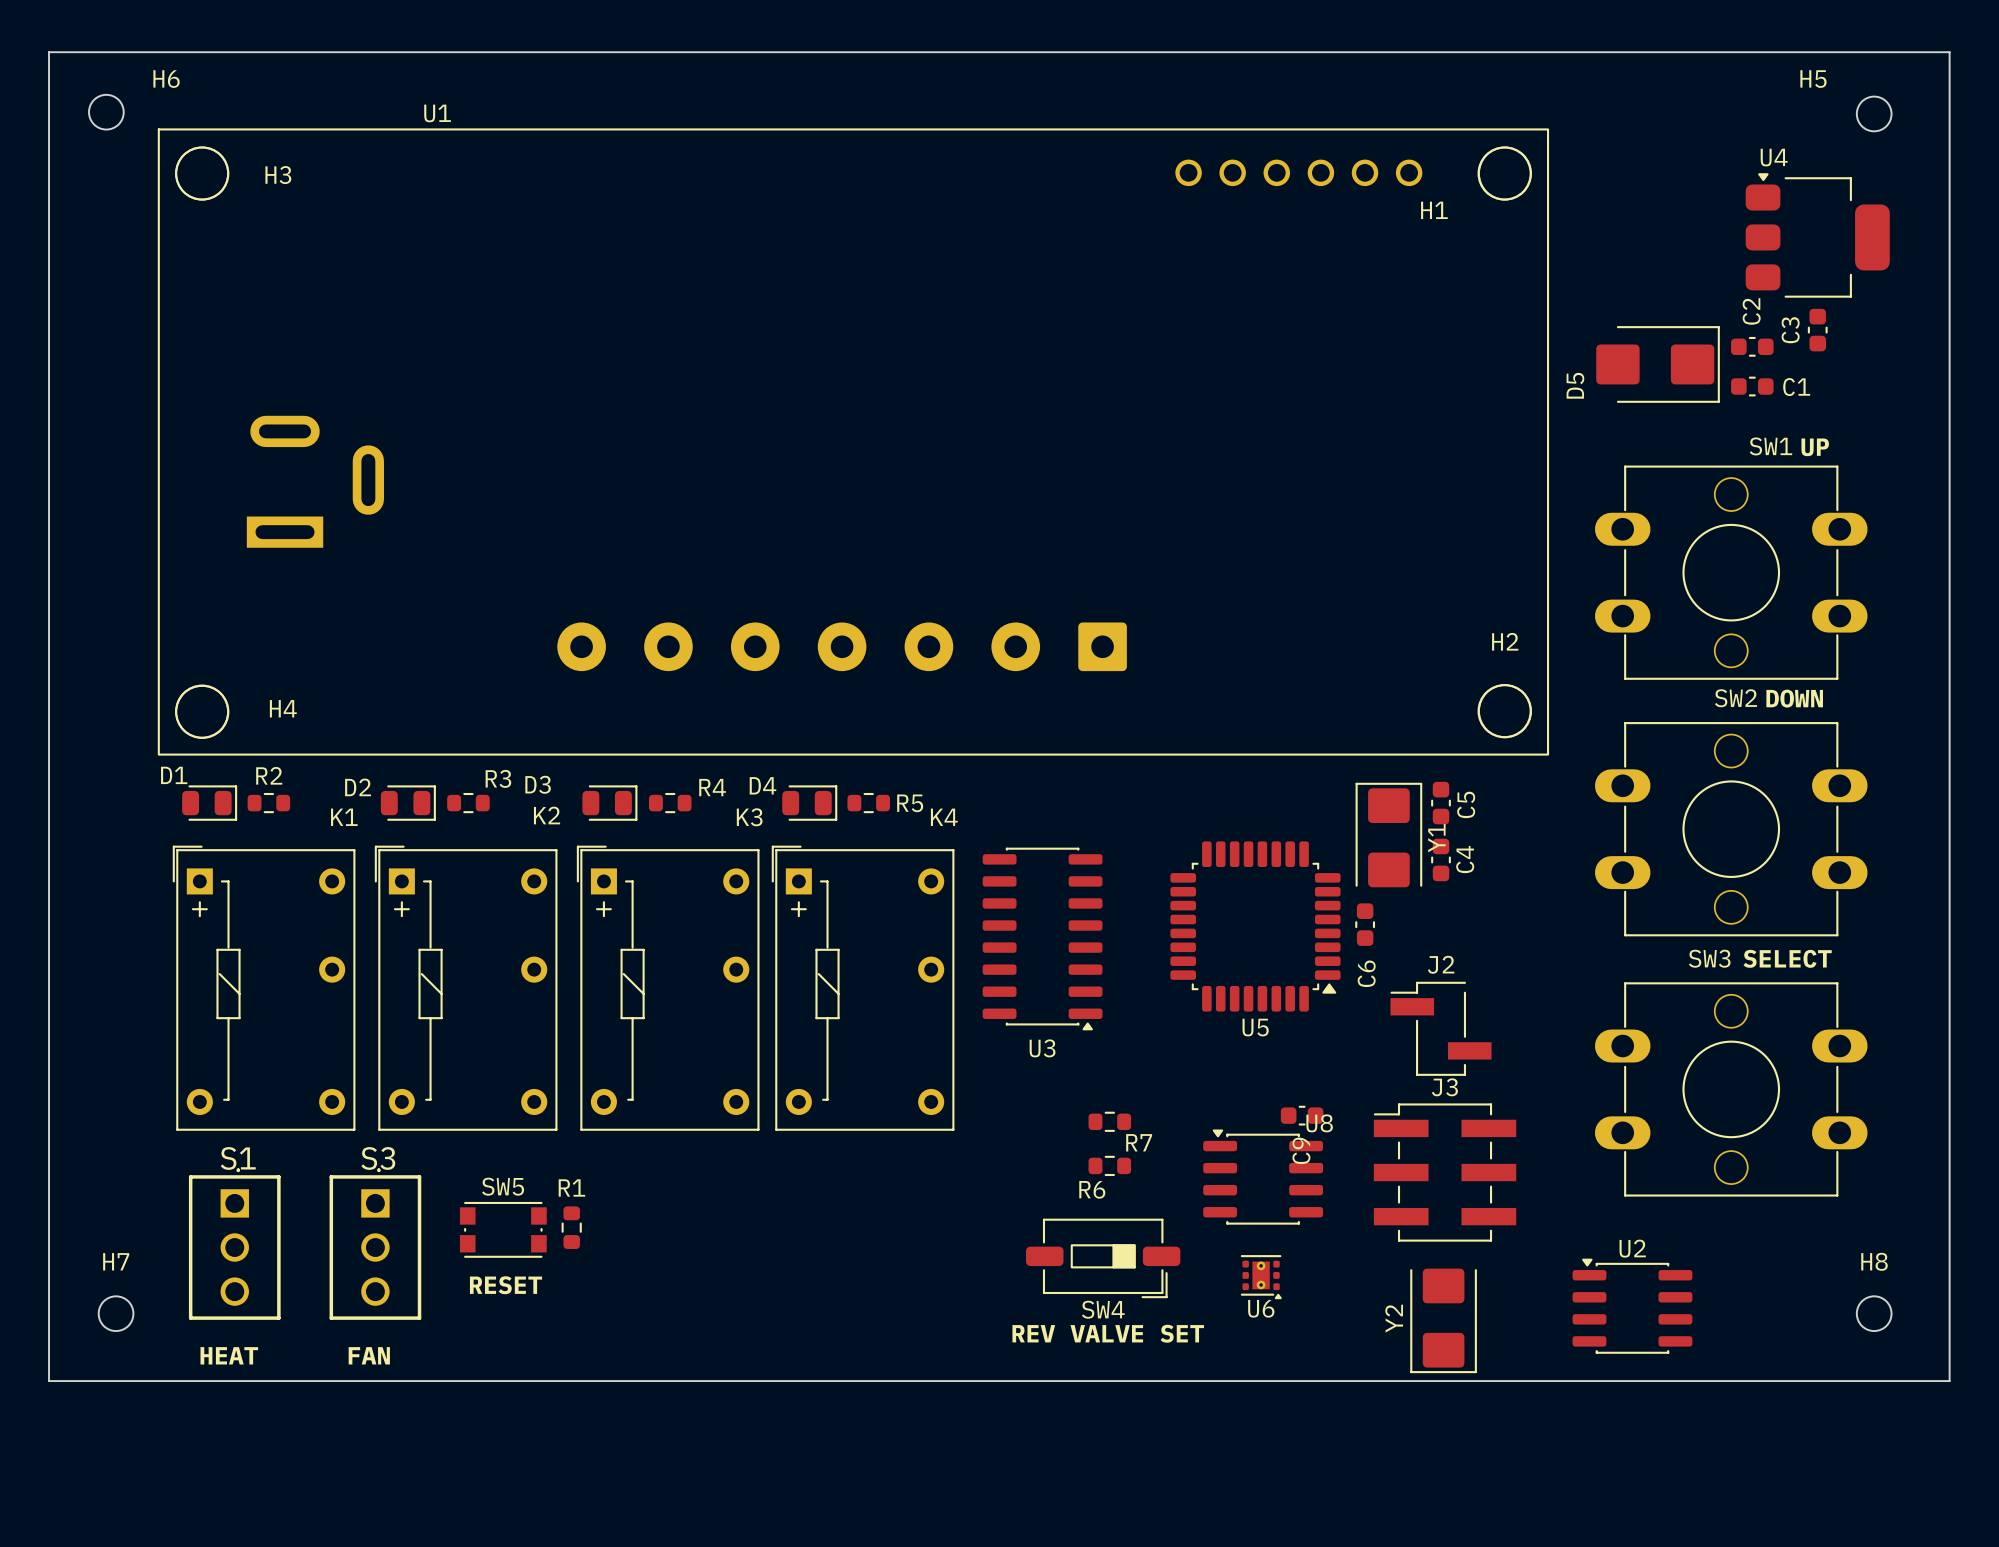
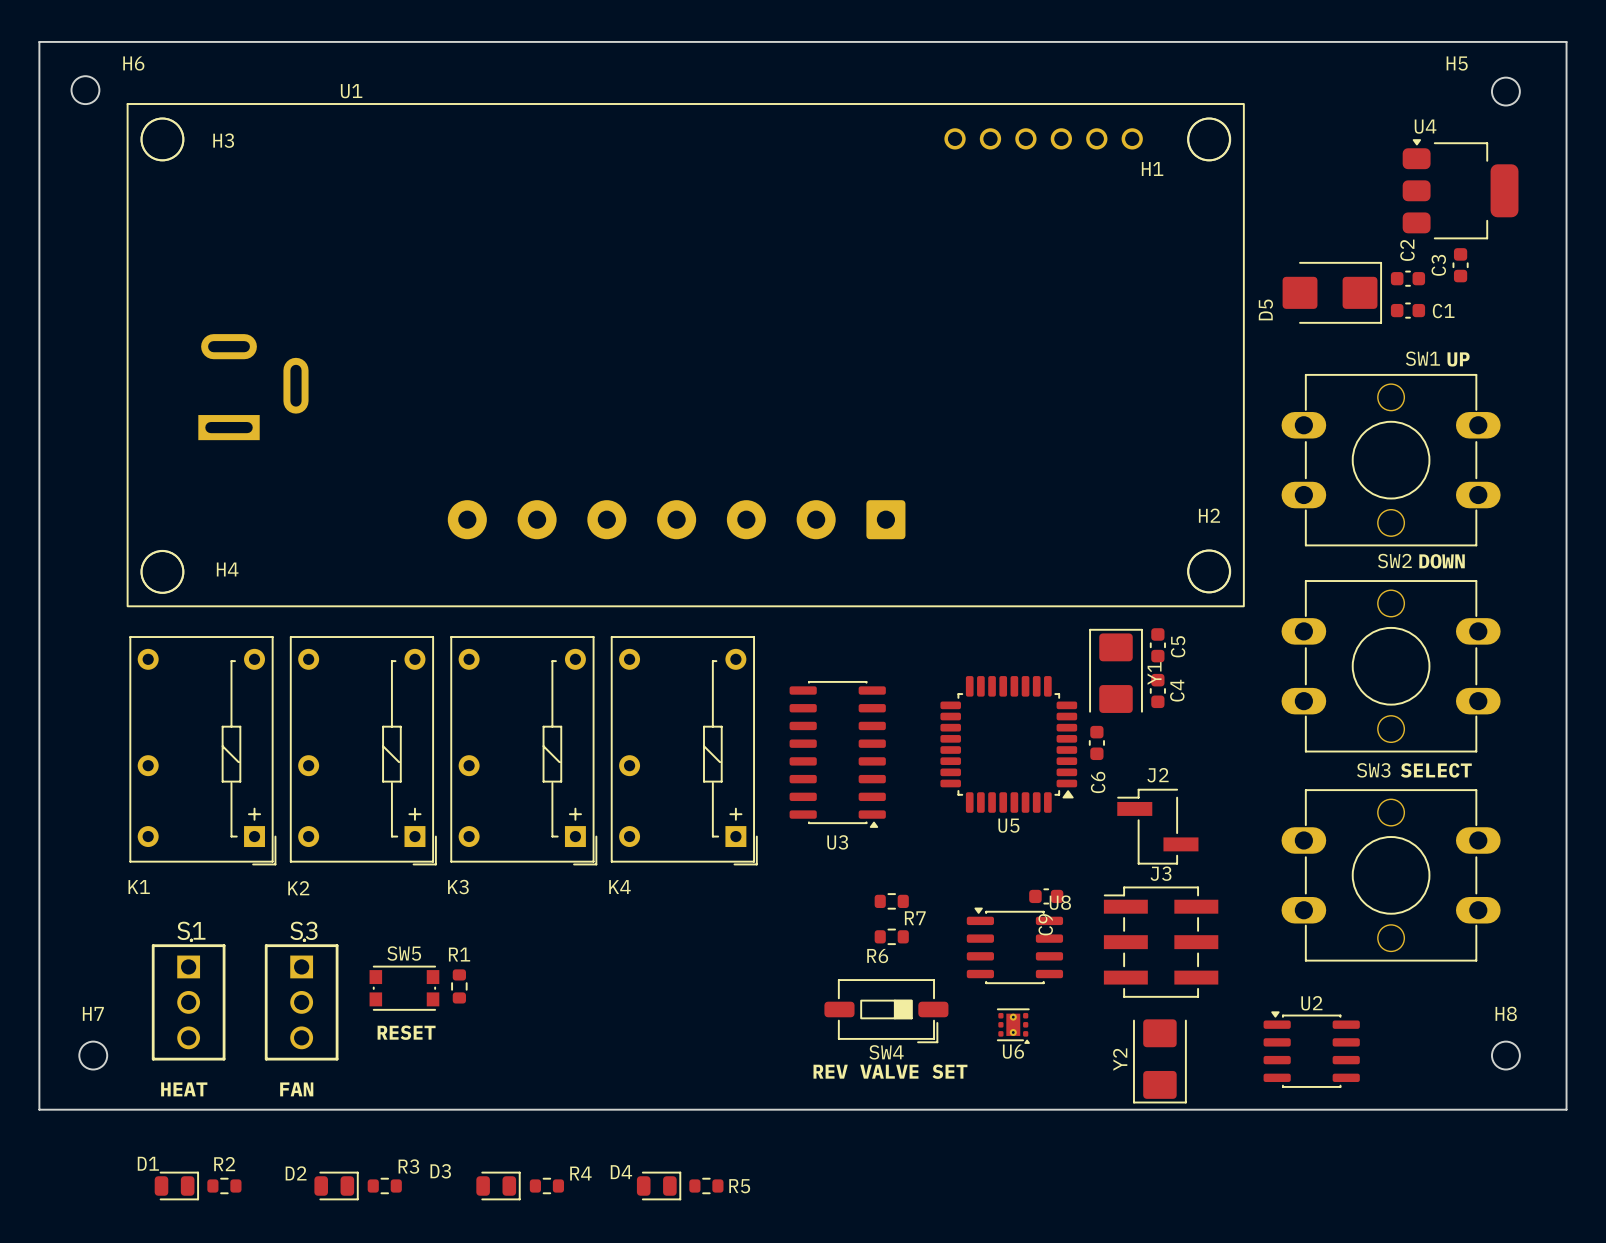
D1 position: (209, 803) -> (176, 1185)
R2 position: (268, 803) -> (224, 1185)
D2 position: (408, 803) -> (336, 1185)
R3 position: (468, 803) -> (384, 1185)
D3 position: (609, 803) -> (498, 1185)
R4 position: (670, 803) -> (546, 1185)
D4 position: (809, 803) -> (659, 1185)
R5 position: (868, 803) -> (706, 1185)
K2 name position: K2 (547, 815) -> K2 (298, 888)
K1 name position: K1 (344, 817) -> K1 (139, 887)
K3 name position: K3 (749, 817) -> K3 (458, 887)
K4 name position: K4 (944, 817) -> K4 (619, 887)
K1 footprint: [172, 845, 356, 1131] -> [129, 636, 277, 866]
K2 footprint: [374, 845, 558, 1131] -> [289, 636, 437, 866]
K3 footprint: [576, 845, 760, 1131] -> [450, 636, 598, 866]
K4 footprint: [771, 845, 955, 1131] -> [610, 636, 758, 866]

